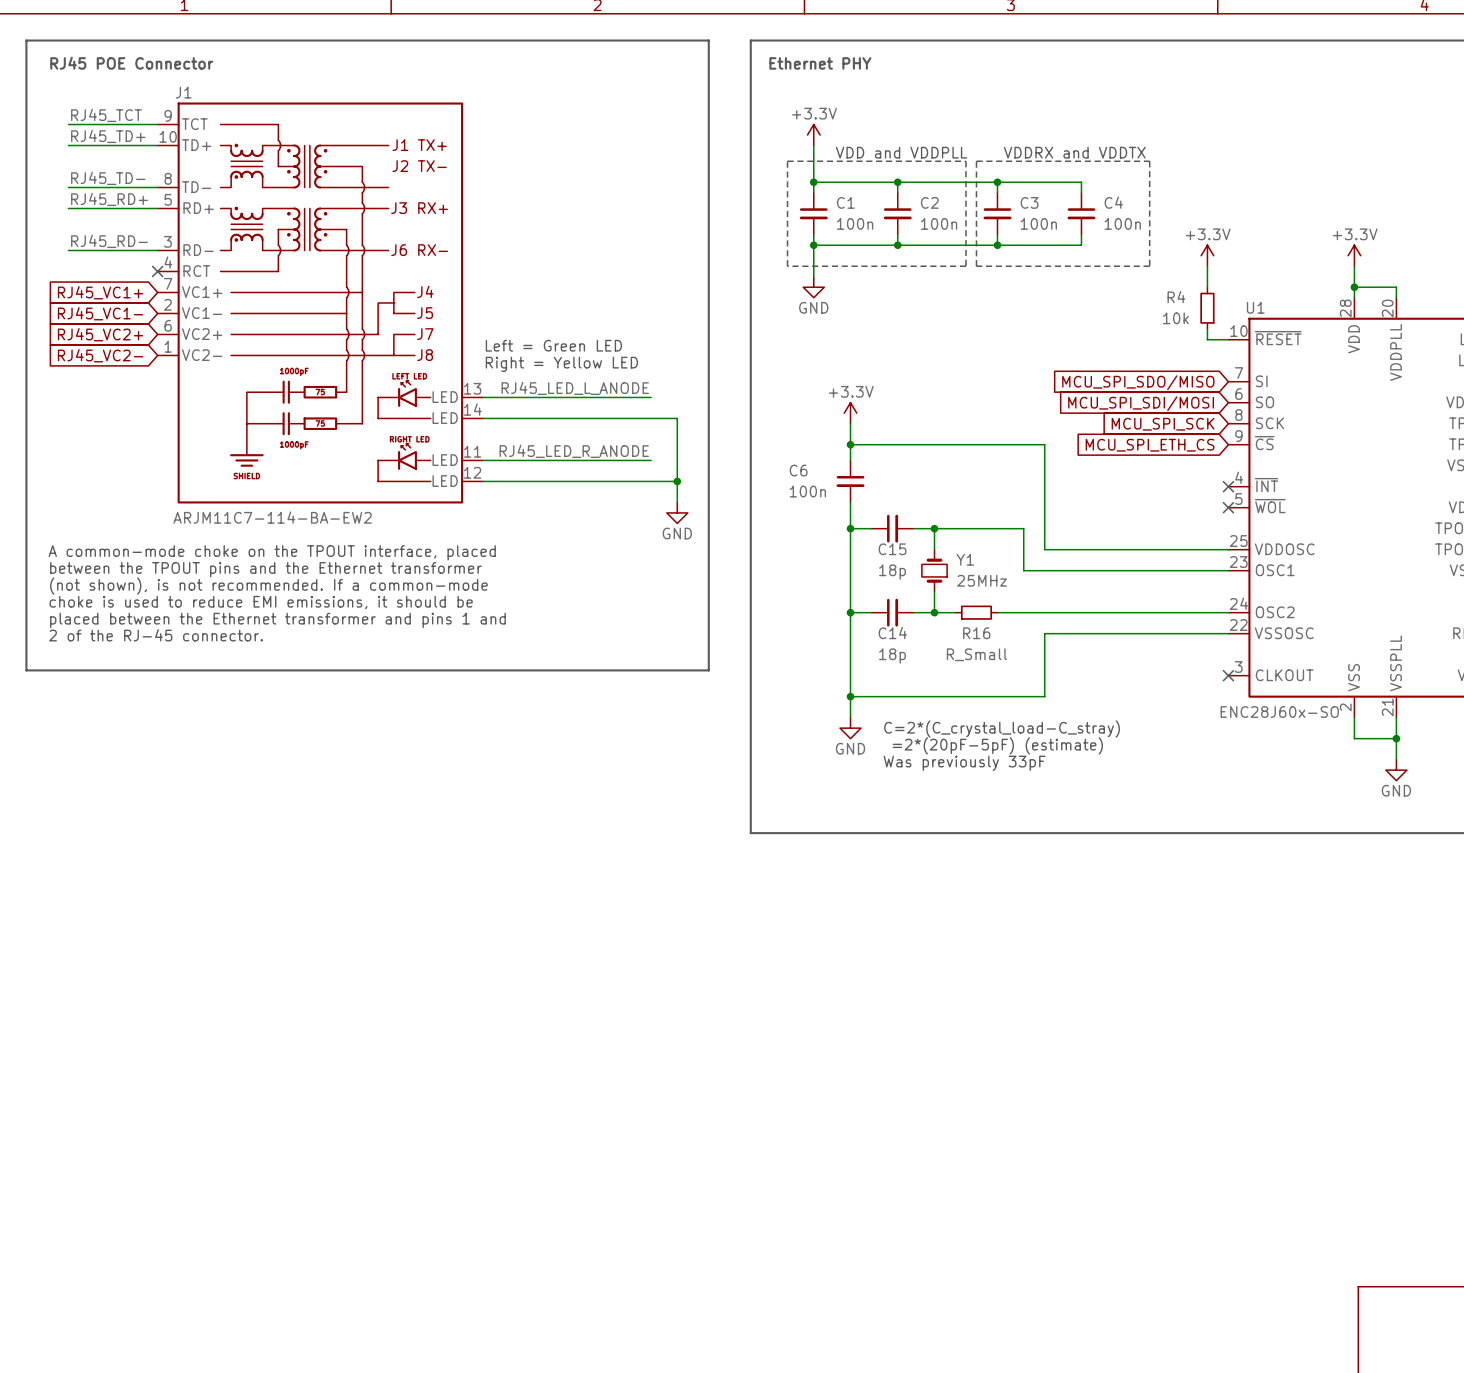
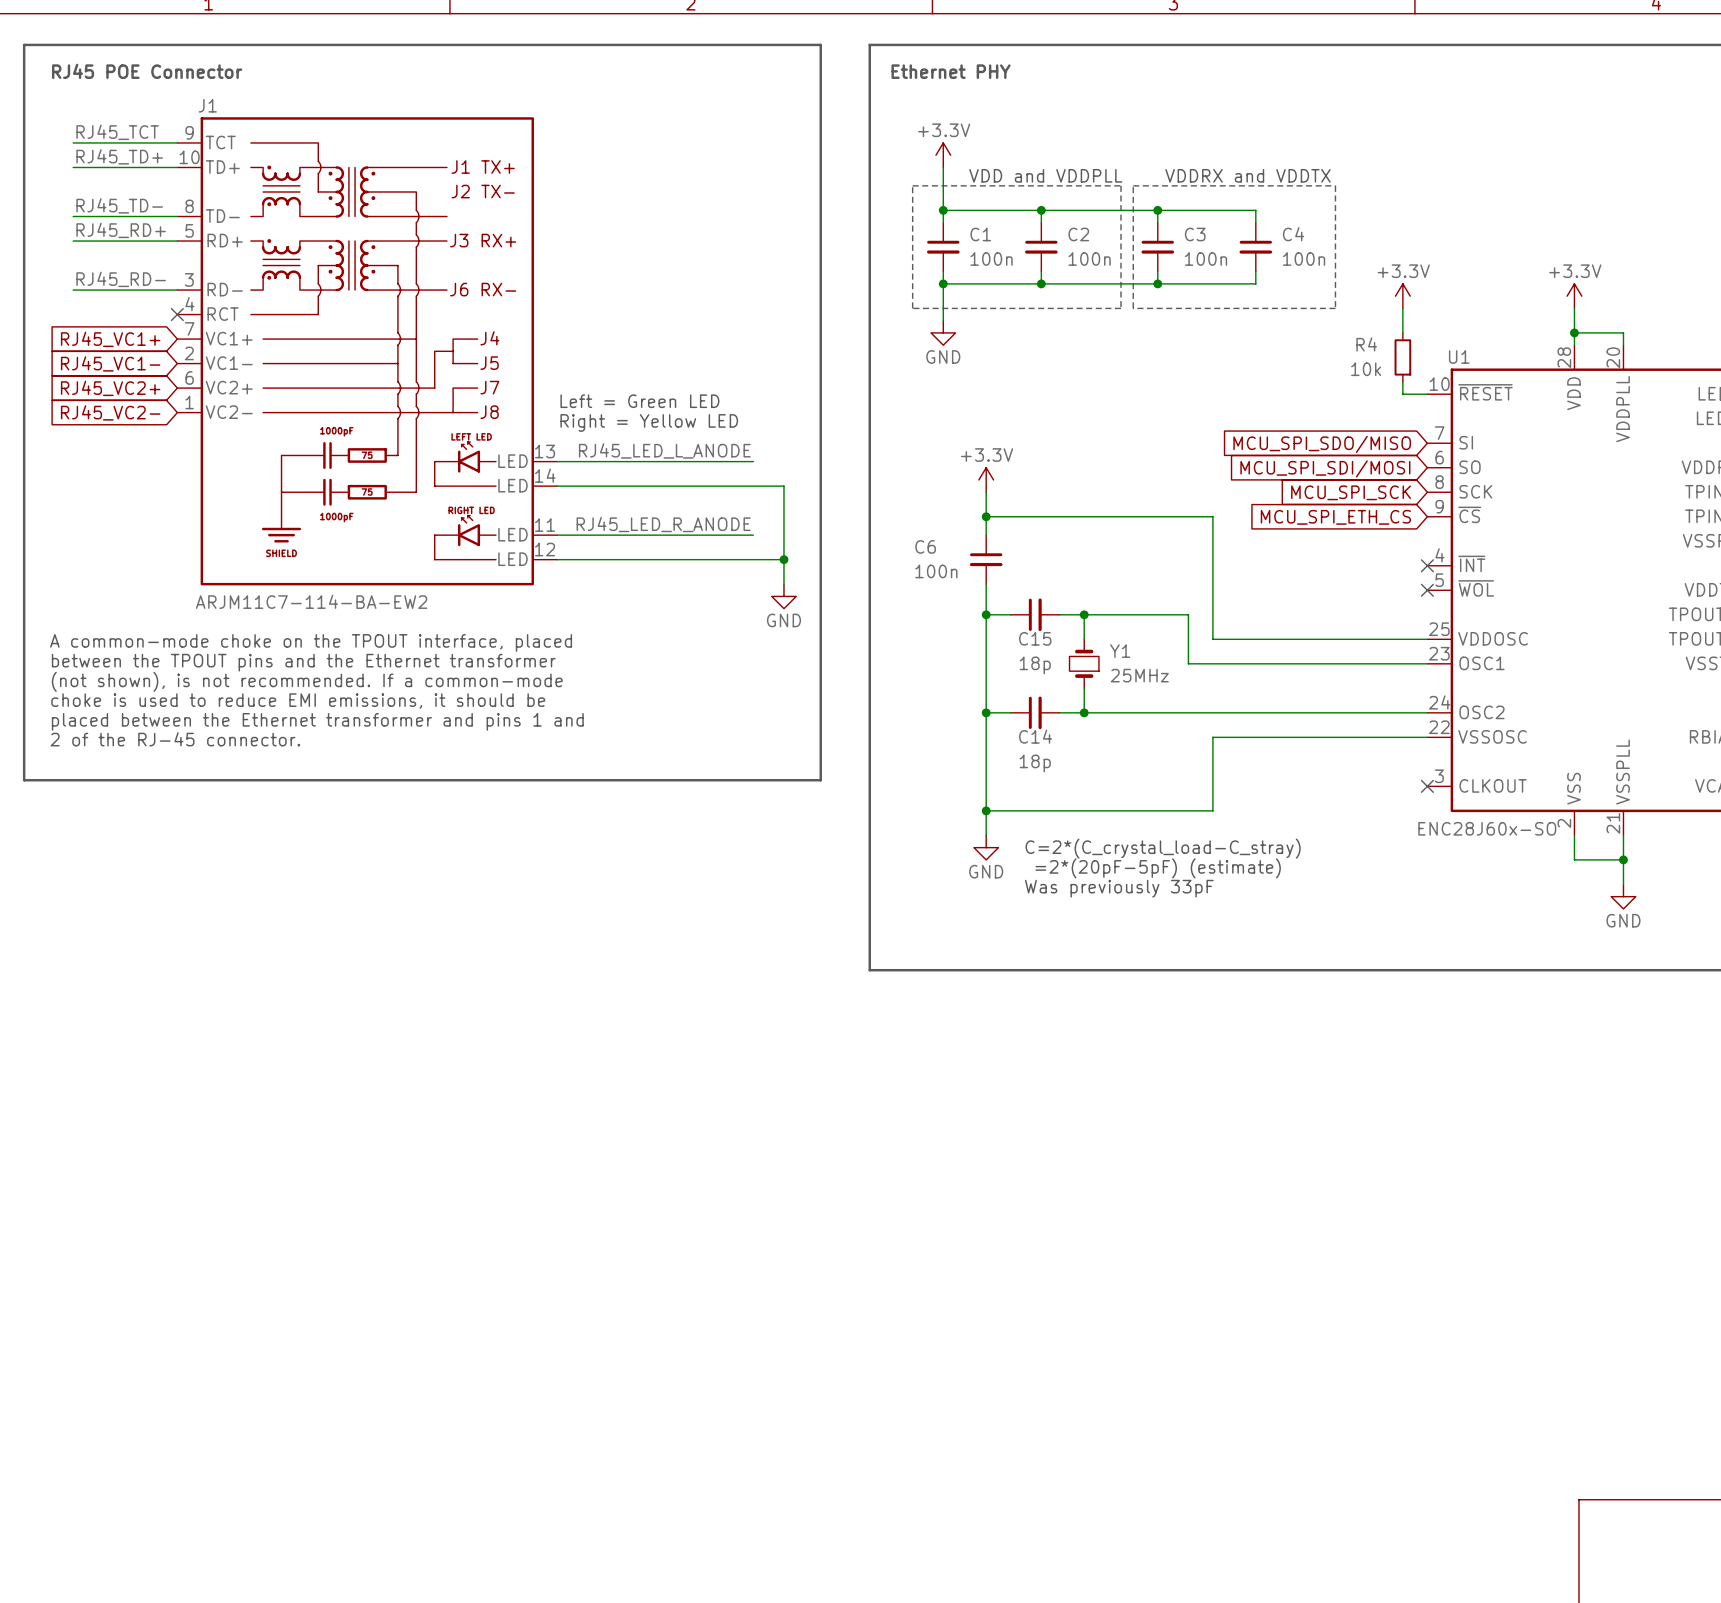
wire: none -> (1108, 712) (1157, 712)
R16: R_Small (976, 612) -> none

